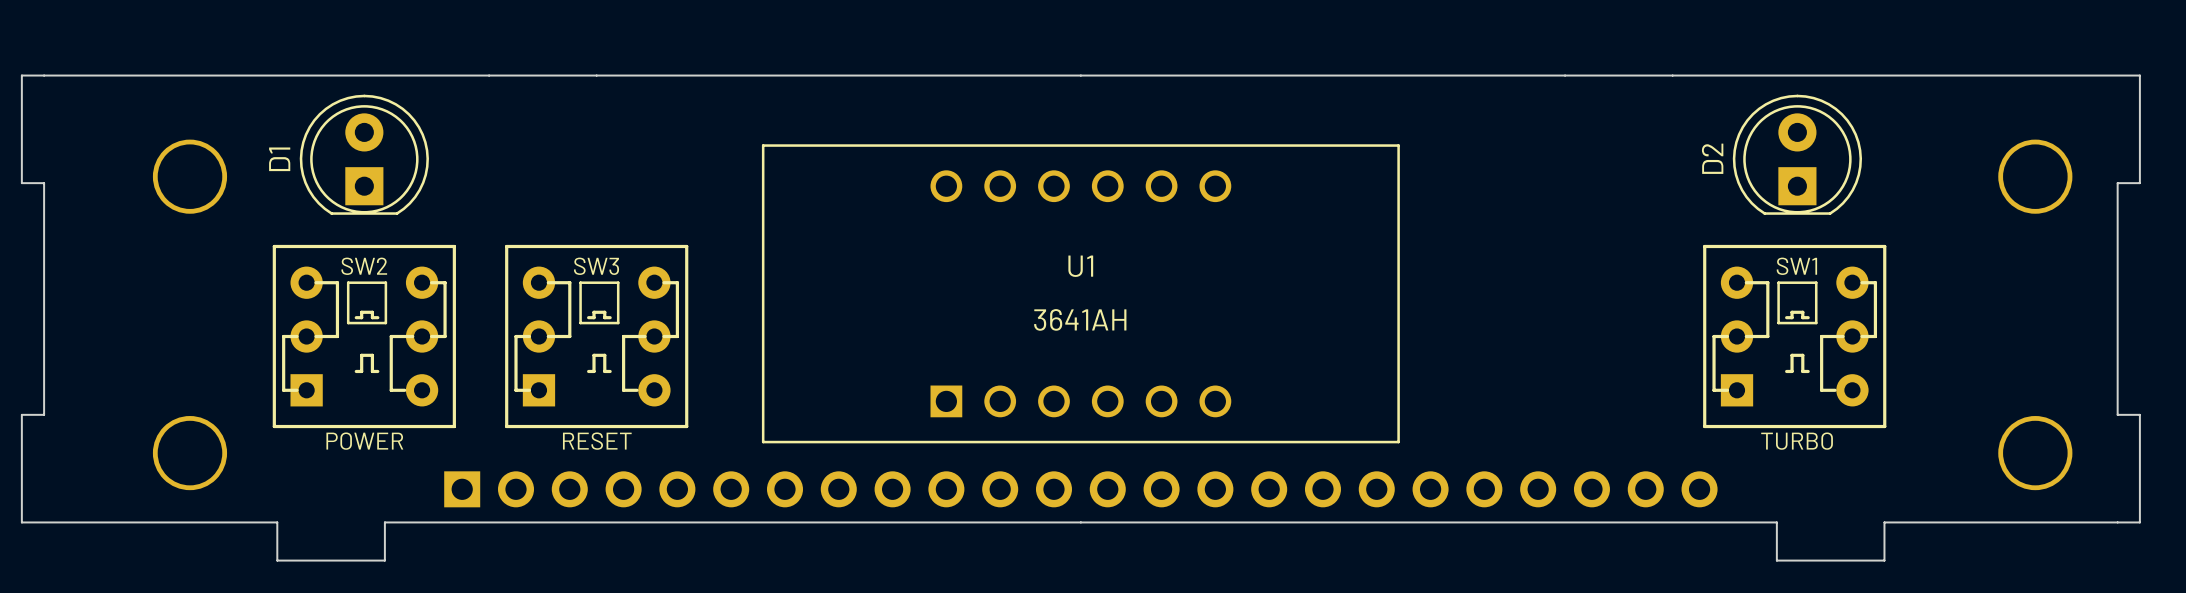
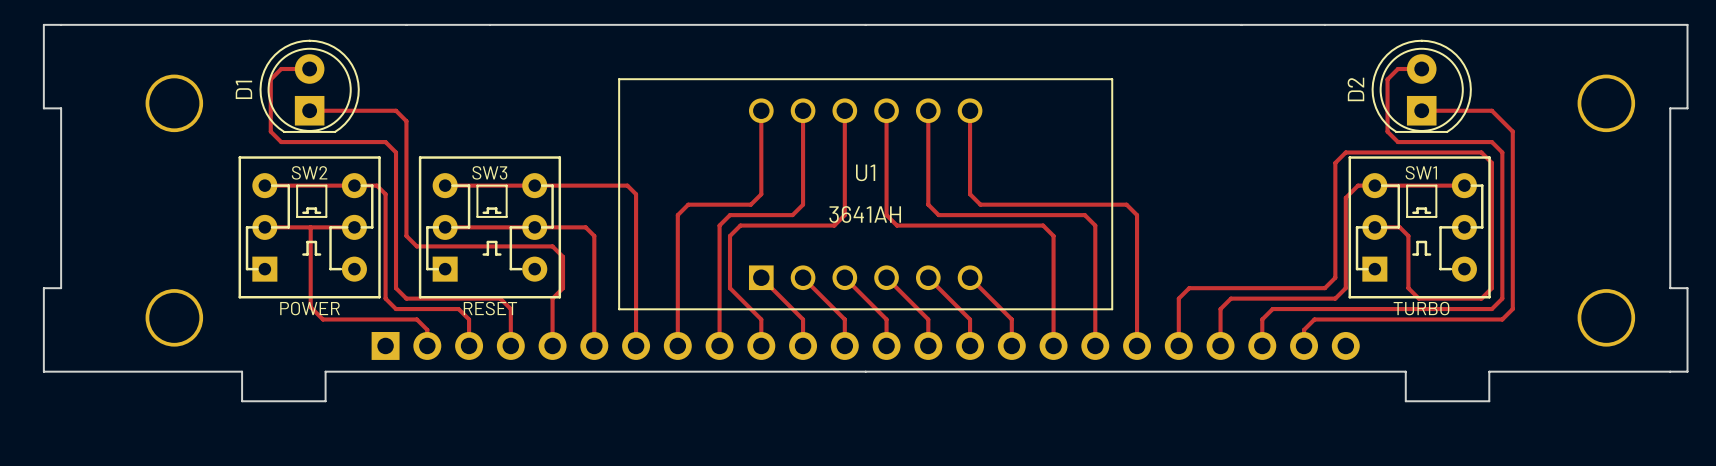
track: none -> (309, 69) (281, 69) (270, 79) (270, 131) (281, 142) (385, 142) (396, 152) (396, 288) (406, 298) (500, 298) (510, 309) (510, 345)
track: none -> (1421, 69) (1397, 69) (1387, 79) (1387, 131) (1397, 142) (1491, 142) (1502, 152) (1502, 298) (1491, 309) (1272, 309) (1262, 319) (1262, 345)
track: none -> (309, 110) (396, 110) (406, 121) (406, 235) (416, 246) (552, 246) (563, 256) (563, 288) (552, 298) (552, 345)
track: none -> (761, 110) (761, 194) (750, 204) (688, 204) (677, 215) (677, 345)
track: none -> (803, 110) (803, 204) (792, 215) (730, 215) (719, 225) (719, 345)
track: none -> (844, 110) (844, 215) (834, 225) (740, 225) (730, 235) (730, 288) (761, 319) (761, 345)
track: none -> (886, 110) (886, 215) (897, 225) (1043, 225) (1053, 235) (1053, 345)
track: none -> (928, 110) (928, 204) (938, 215) (1084, 215) (1095, 225) (1095, 345)
track: none -> (970, 110) (970, 194) (980, 204) (1126, 204) (1137, 215) (1137, 345)
track: none -> (1421, 110) (1491, 110) (1512, 131) (1512, 309) (1502, 319) (1314, 319) (1304, 329) (1304, 345)
track: none -> (264, 185) (376, 185) (385, 194) (385, 298) (396, 309) (458, 309) (469, 319) (469, 345)
track: none -> (445, 185) (627, 185) (636, 194) (636, 345)
track: none -> (1464, 185) (1358, 185) (1345, 197) (1345, 288) (1335, 298) (1230, 298) (1220, 309) (1220, 345)
track: none -> (264, 227) (354, 227)
track: none -> (310, 227) (310, 307) (322, 319) (416, 319) (427, 329) (427, 345)
track: none -> (445, 227) (585, 227) (594, 235) (594, 345)
track: none -> (1374, 227) (1399, 227) (1408, 235) (1408, 288) (1418, 298) (1481, 298) (1491, 288) (1491, 162) (1481, 152) (1345, 152) (1335, 162) (1335, 277) (1324, 288) (1189, 288) (1178, 298) (1178, 345)
track: none -> (761, 277) (803, 319) (803, 345)
track: none -> (803, 277) (844, 319) (844, 345)
track: none -> (844, 277) (886, 319) (886, 345)
track: none -> (886, 277) (928, 319) (928, 345)
track: none -> (928, 277) (970, 319) (970, 345)
track: none -> (970, 277) (1011, 319) (1011, 345)

